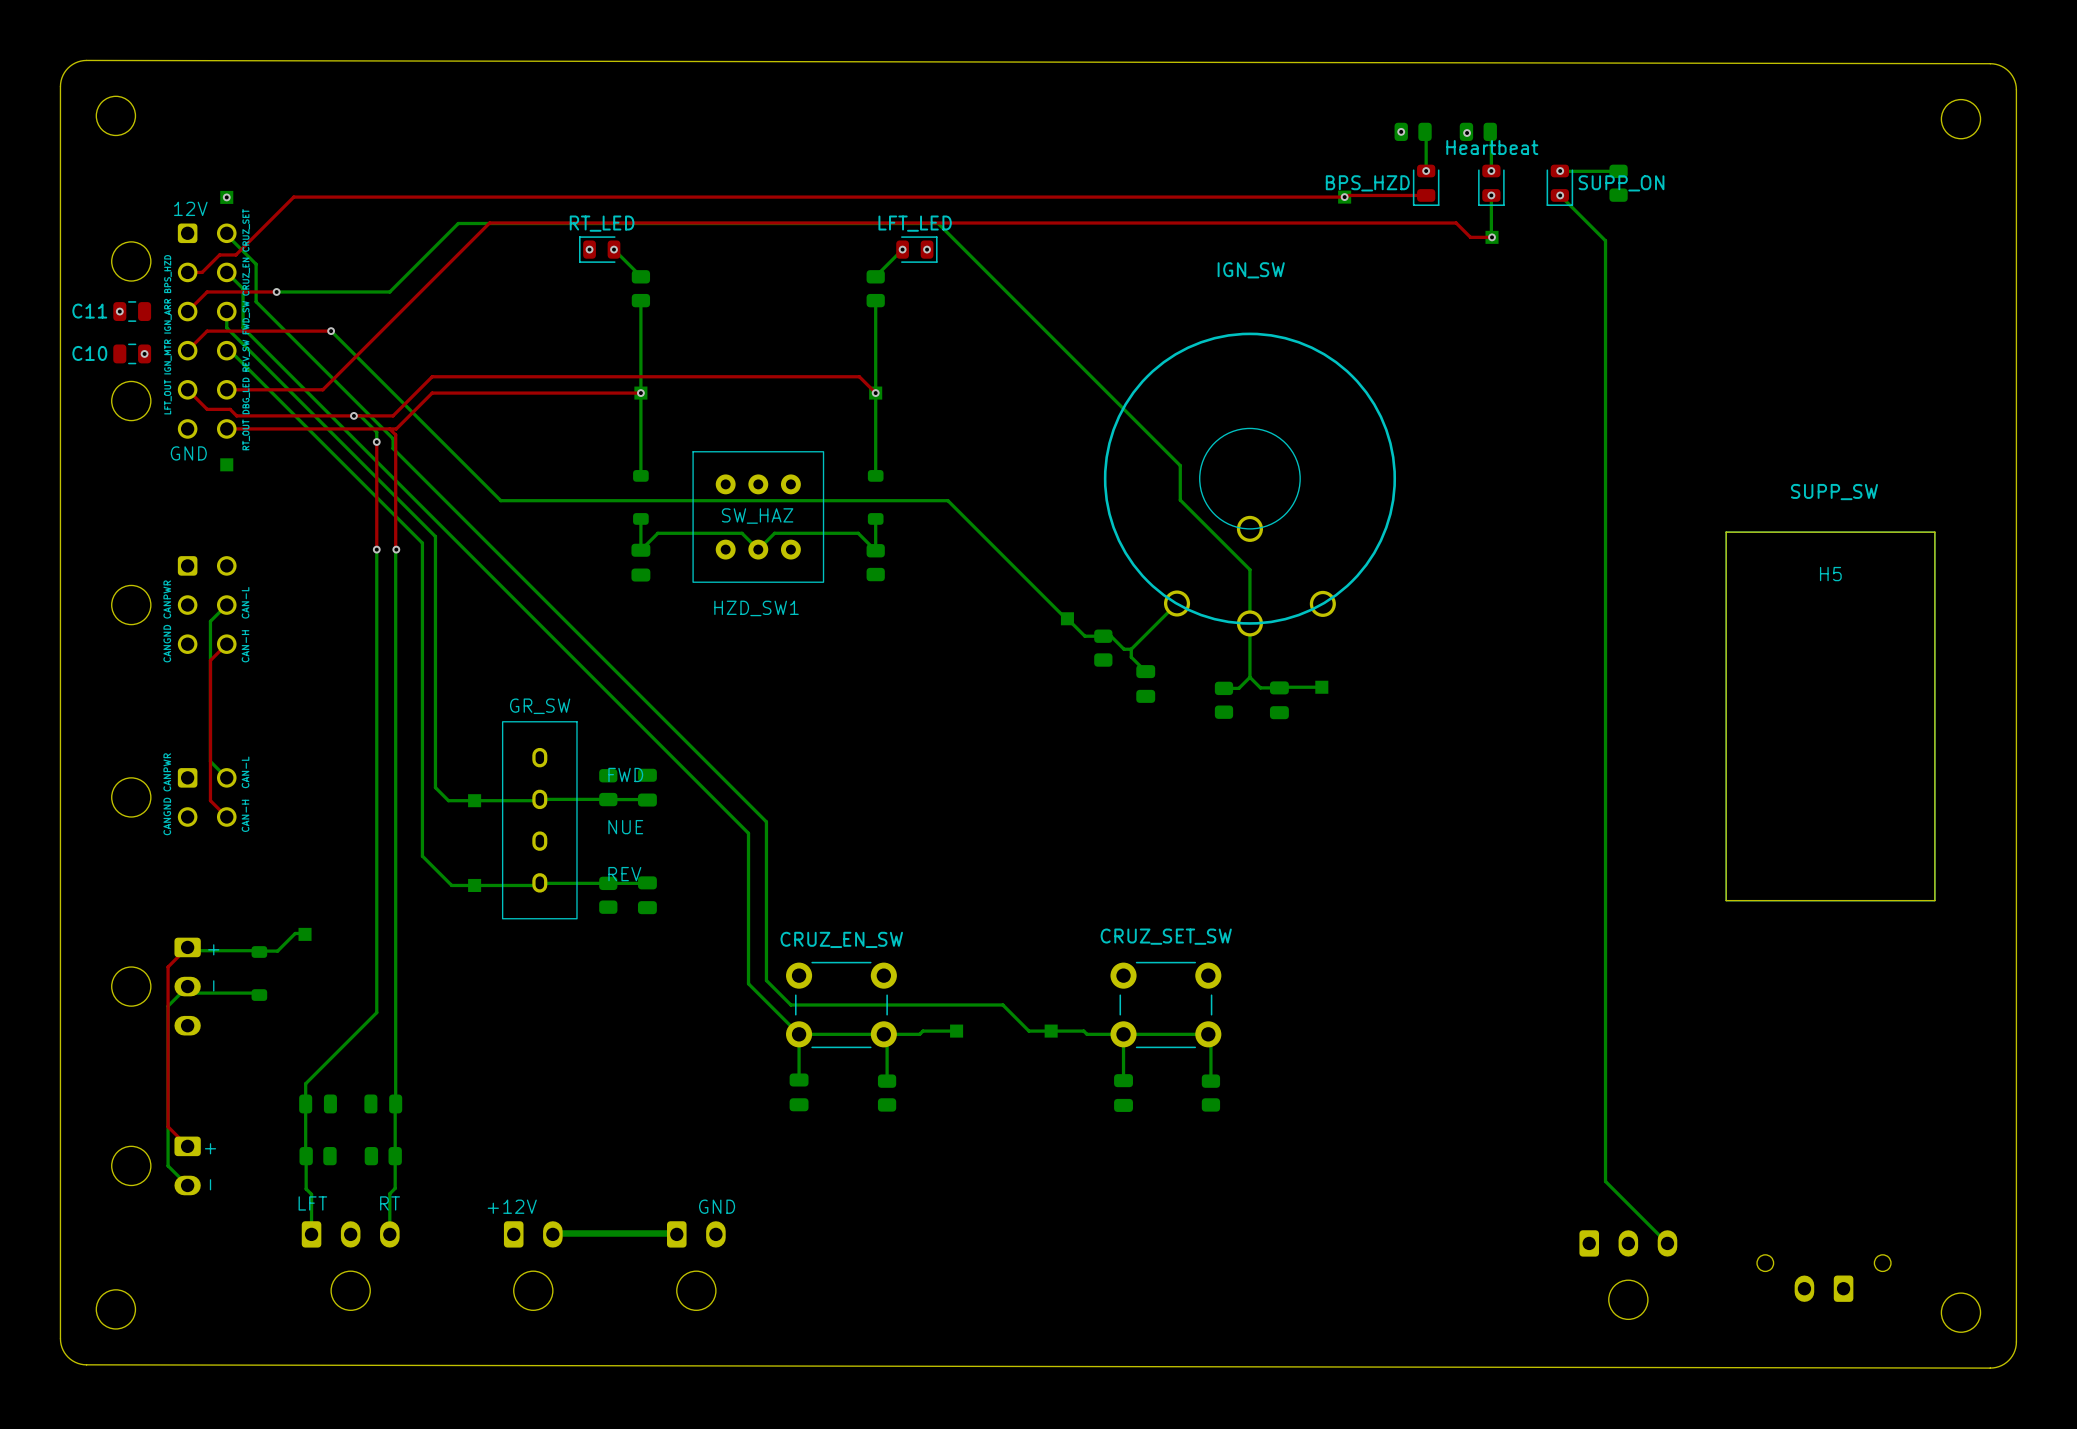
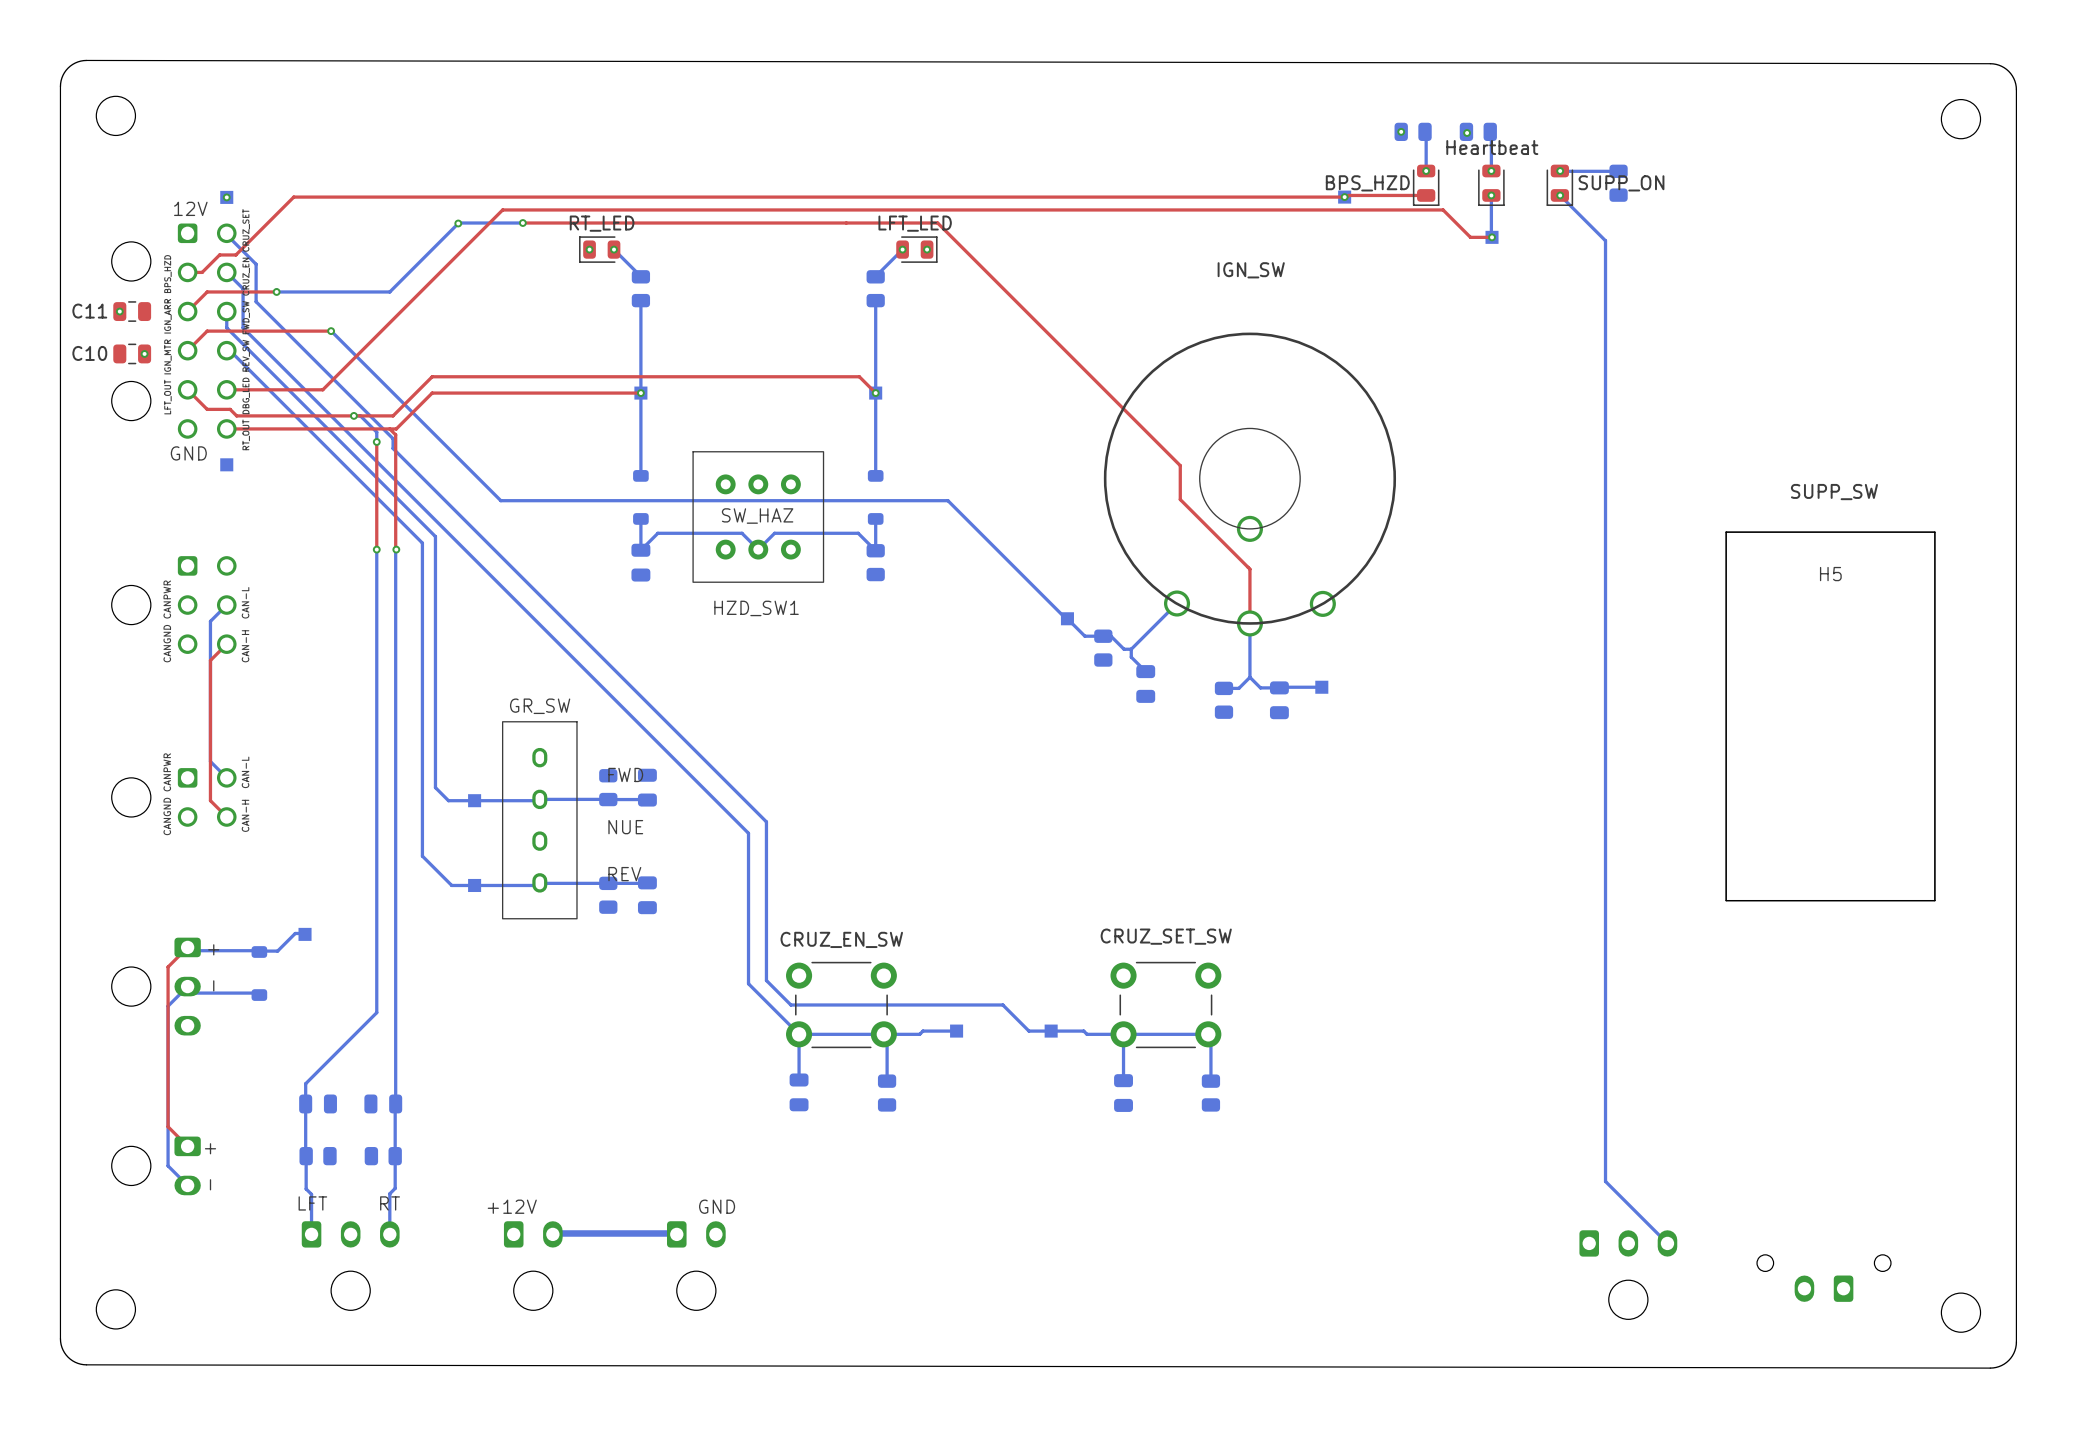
bottom track: (458, 223) (938, 223) (1180, 465) (1180, 500) (1249, 569) (1249, 623) -> (458, 223) (522, 223)
via: none -> (458, 223)
top track: (489, 223) (522, 223) -> none
via: none -> (522, 223)
top track: (937, 223) (1456, 223) -> (489, 223) (502, 209) (1443, 209) (1456, 223)
top track: none -> (937, 223) (1180, 465) (1180, 499) (1249, 569) (1249, 623)

